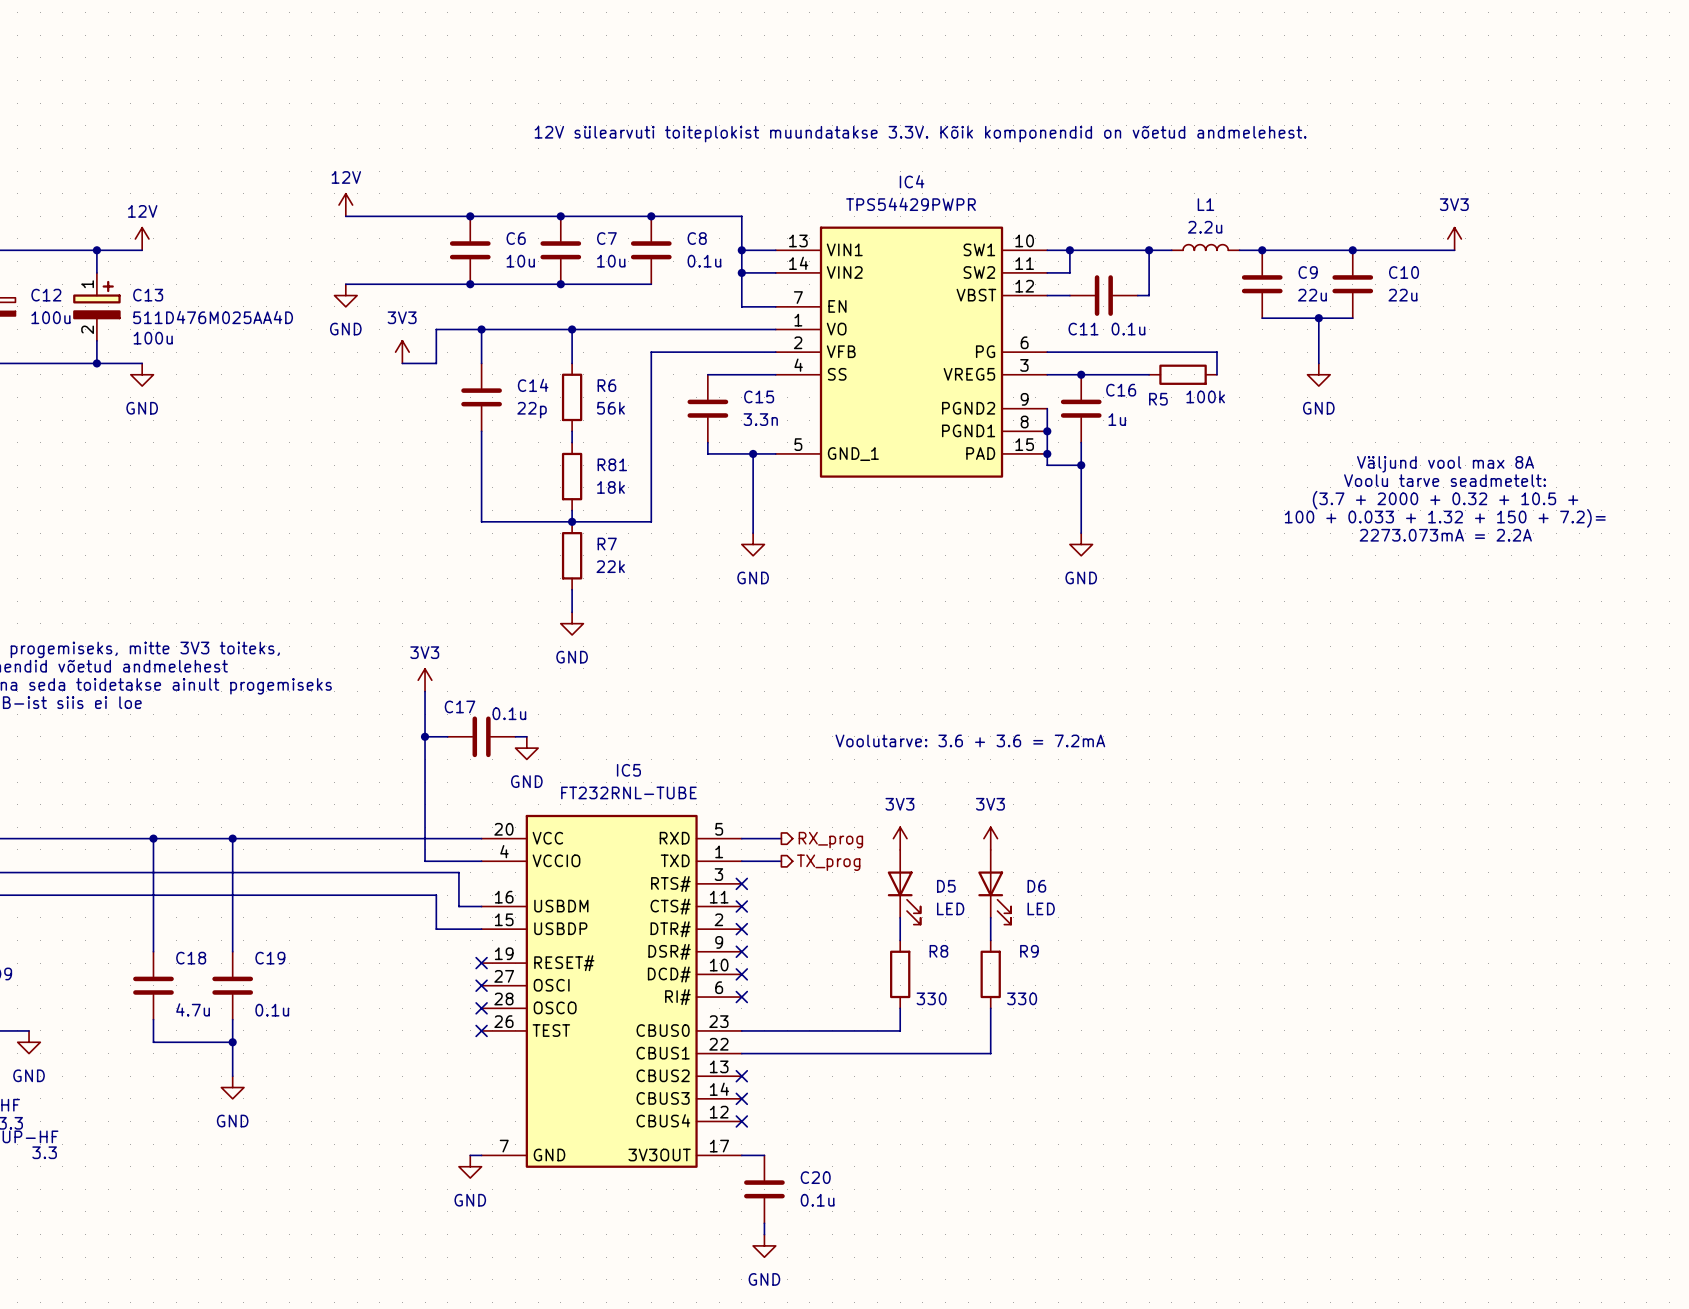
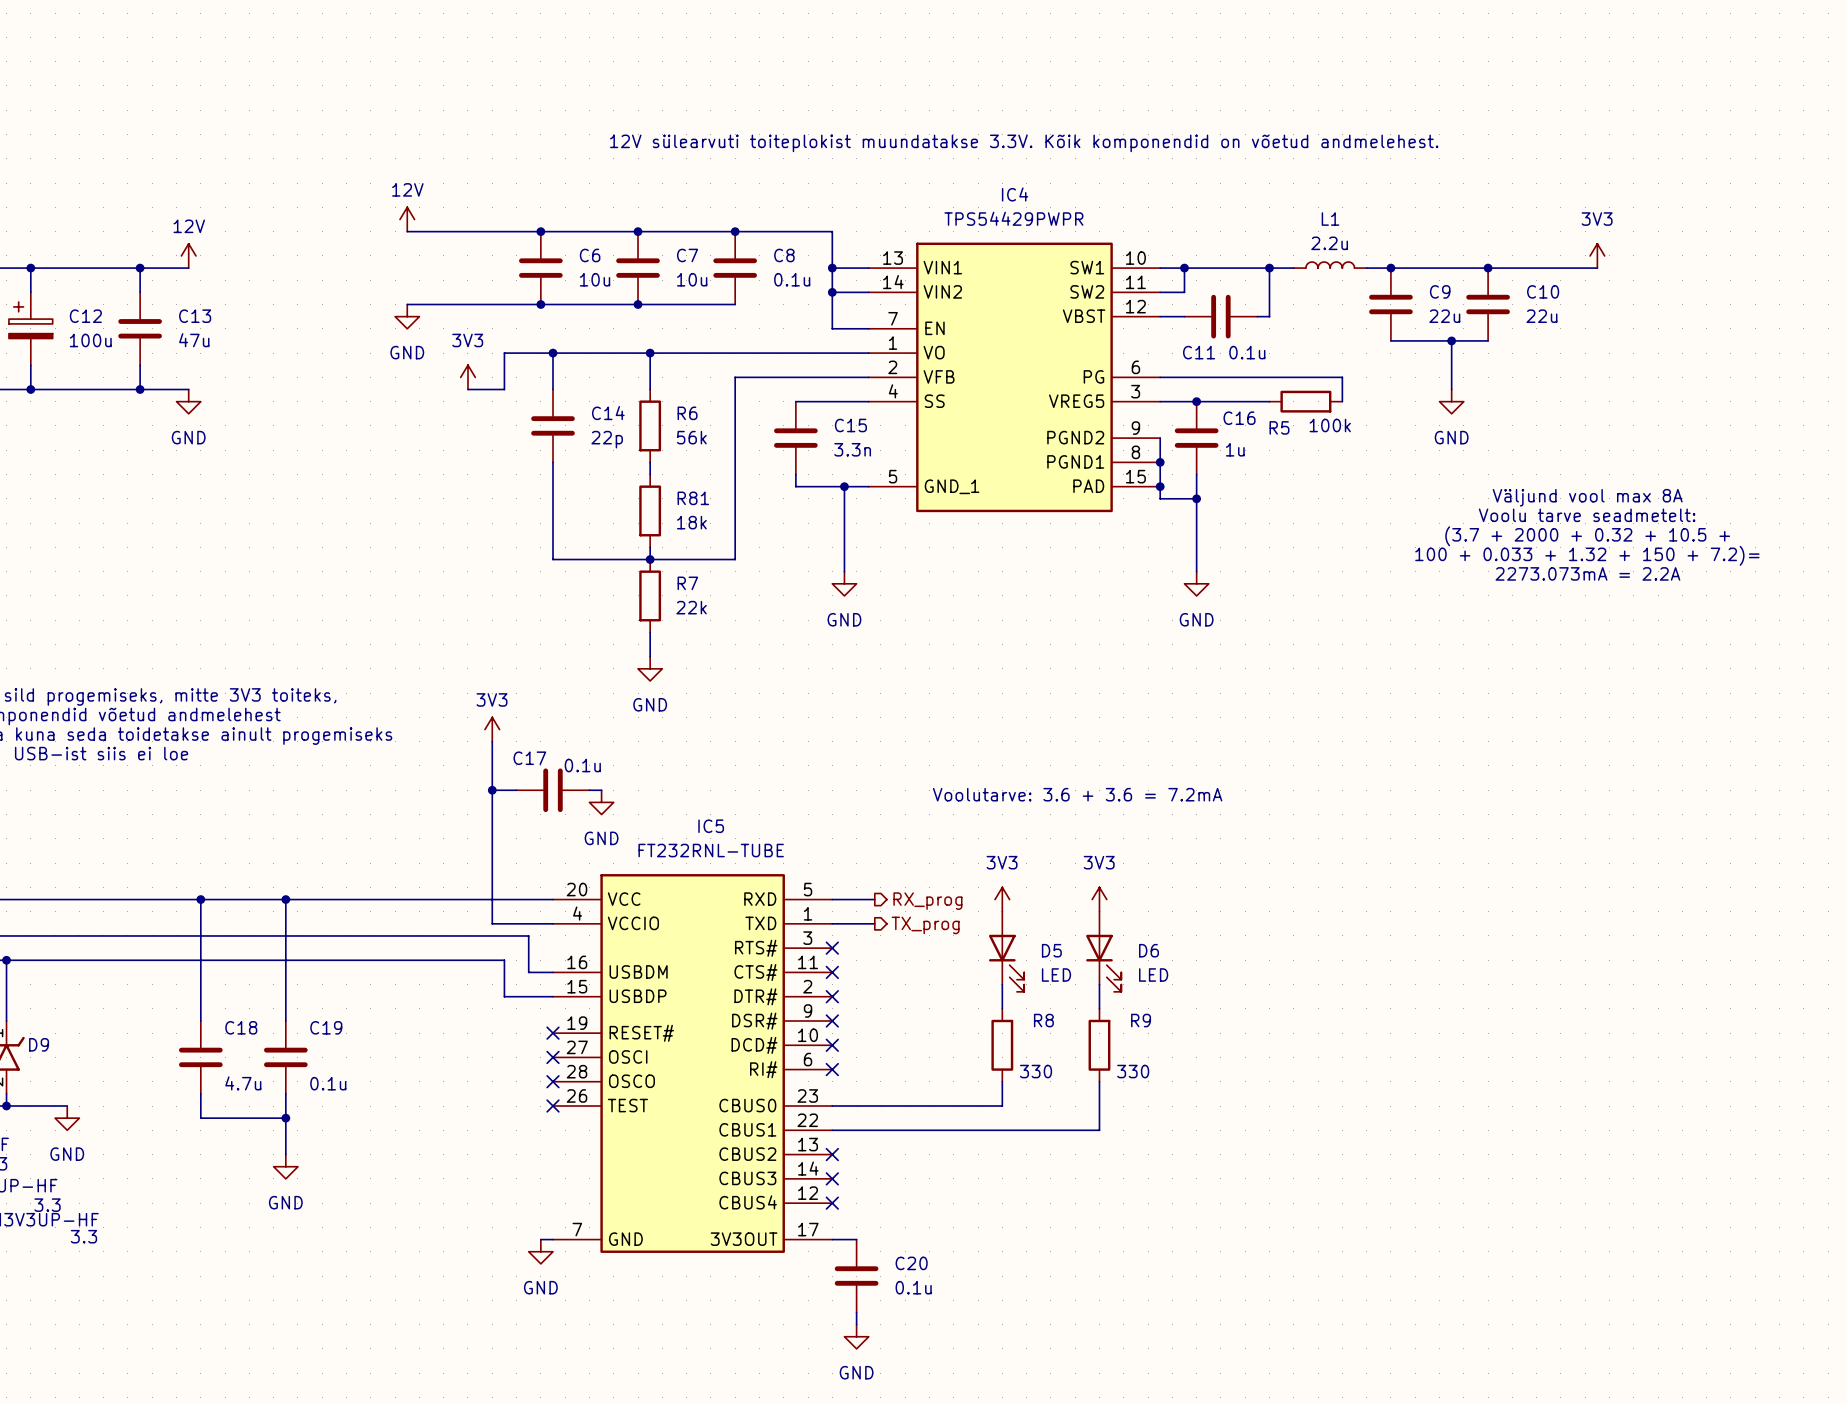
C13 symbol: [73, 272, 121, 341] -> [118, 292, 162, 366]
C13 value: 511D476M025AA4D (213, 317) -> 47u (194, 340)
text: 100u (153, 338) -> none

